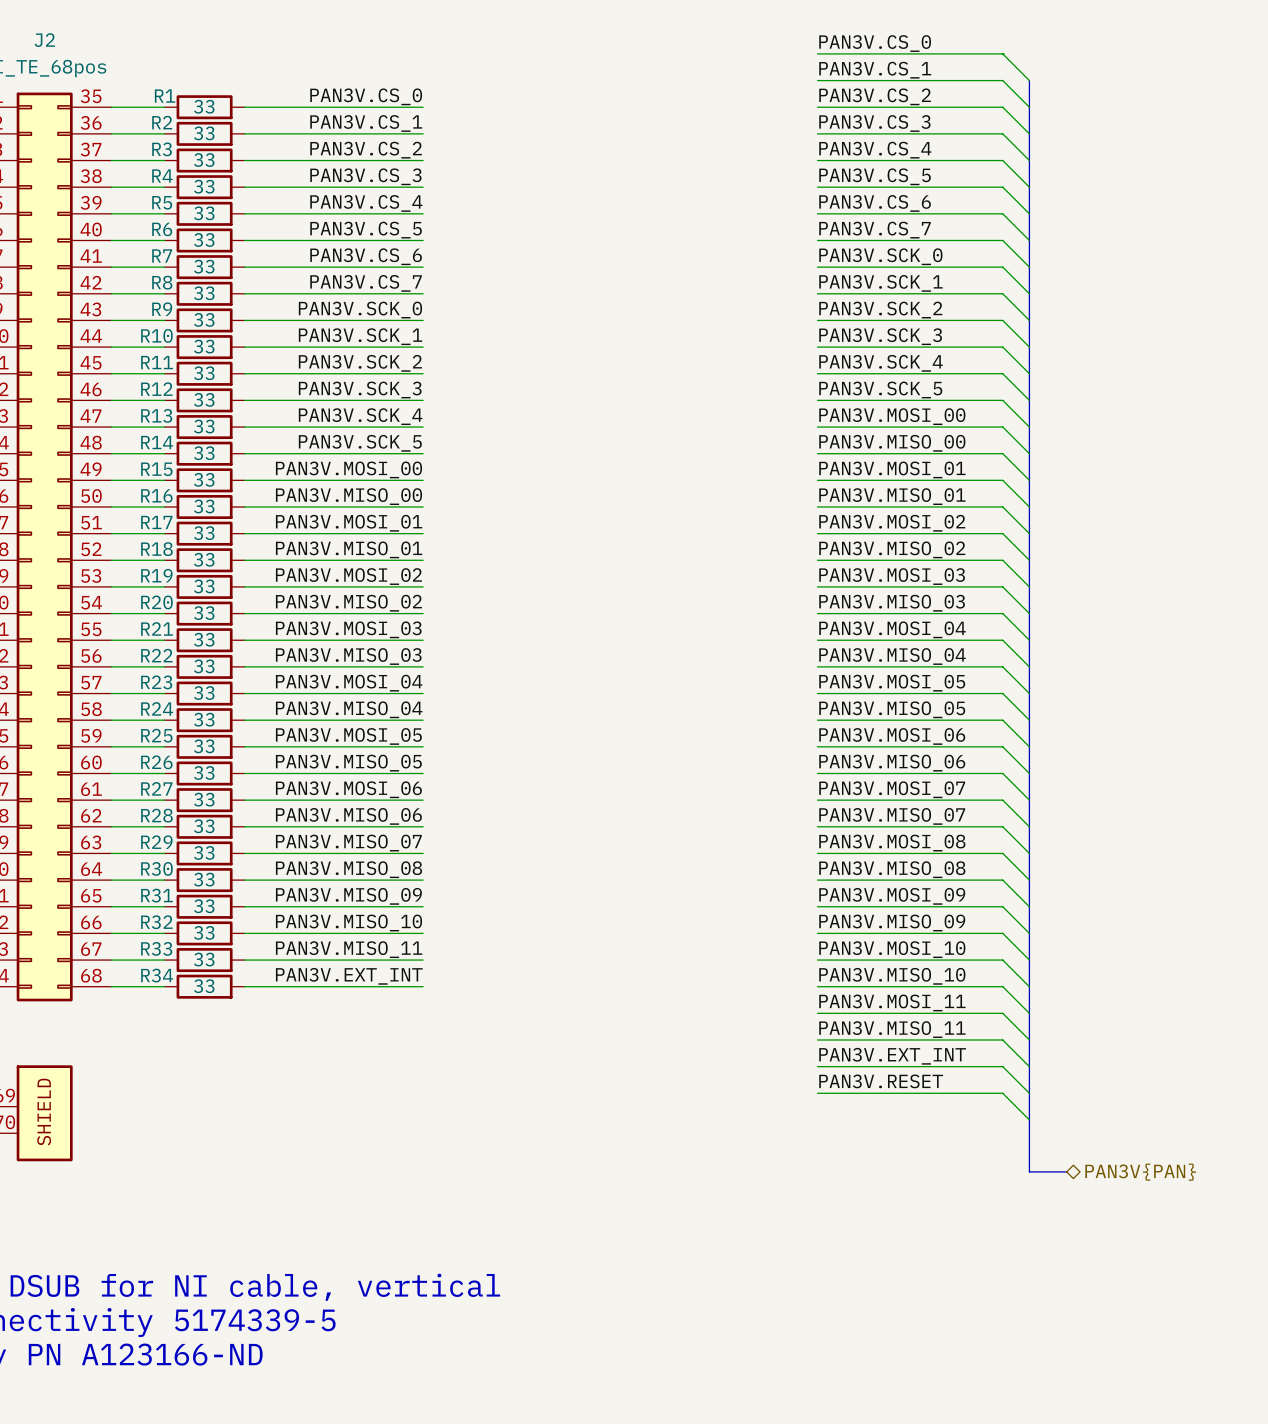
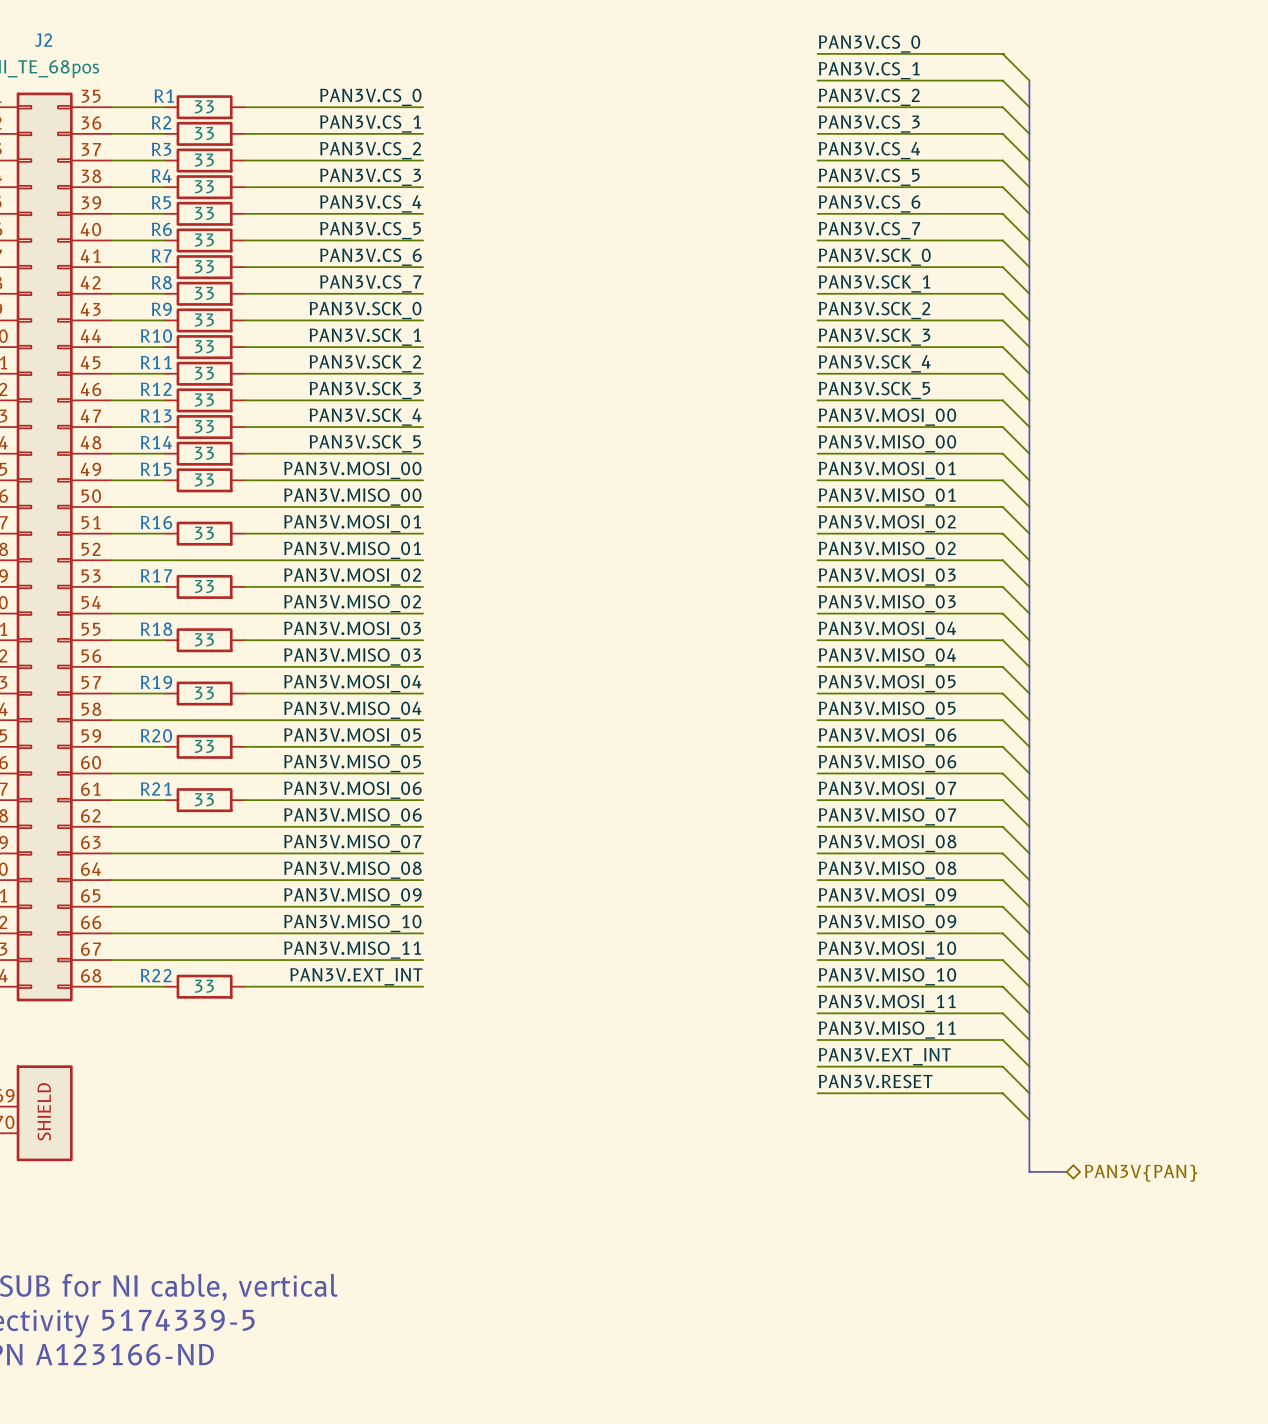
wire: none -> (164, 506) (244, 506)
R16: 33 (204, 506) -> none
R17 name: R17 (156, 522) -> R16 (156, 522)
wire: none -> (164, 560) (244, 560)
R18: 33 (204, 560) -> none
R19 name: R19 (156, 575) -> R17 (156, 575)
wire: none -> (164, 613) (244, 613)
R20: 33 (204, 613) -> none
R21 name: R21 (157, 628) -> R18 (156, 629)
wire: none -> (164, 666) (244, 666)
R22: 33 (204, 666) -> none
R23 name: R23 (156, 682) -> R19 (156, 682)
wire: none -> (164, 720) (244, 720)
R24: 33 (204, 720) -> none
R25 name: R25 (156, 735) -> R20 (156, 735)
wire: none -> (164, 773) (244, 773)
R26: 33 (204, 773) -> none
R27 name: R27 (156, 788) -> R21 (156, 788)
wire: none -> (164, 826) (244, 826)
R28: 33 (204, 826) -> none
wire: none -> (164, 853) (244, 853)
R29: 33 (204, 853) -> none
wire: none -> (164, 880) (244, 880)
R30: 33 (204, 880) -> none
wire: none -> (164, 906) (244, 906)
R31: 33 (204, 906) -> none
wire: none -> (164, 933) (244, 933)
R32: 33 (204, 933) -> none
wire: none -> (164, 960) (244, 960)
R33: 33 (204, 960) -> none
R34 name: R34 (157, 975) -> R22 (156, 975)

